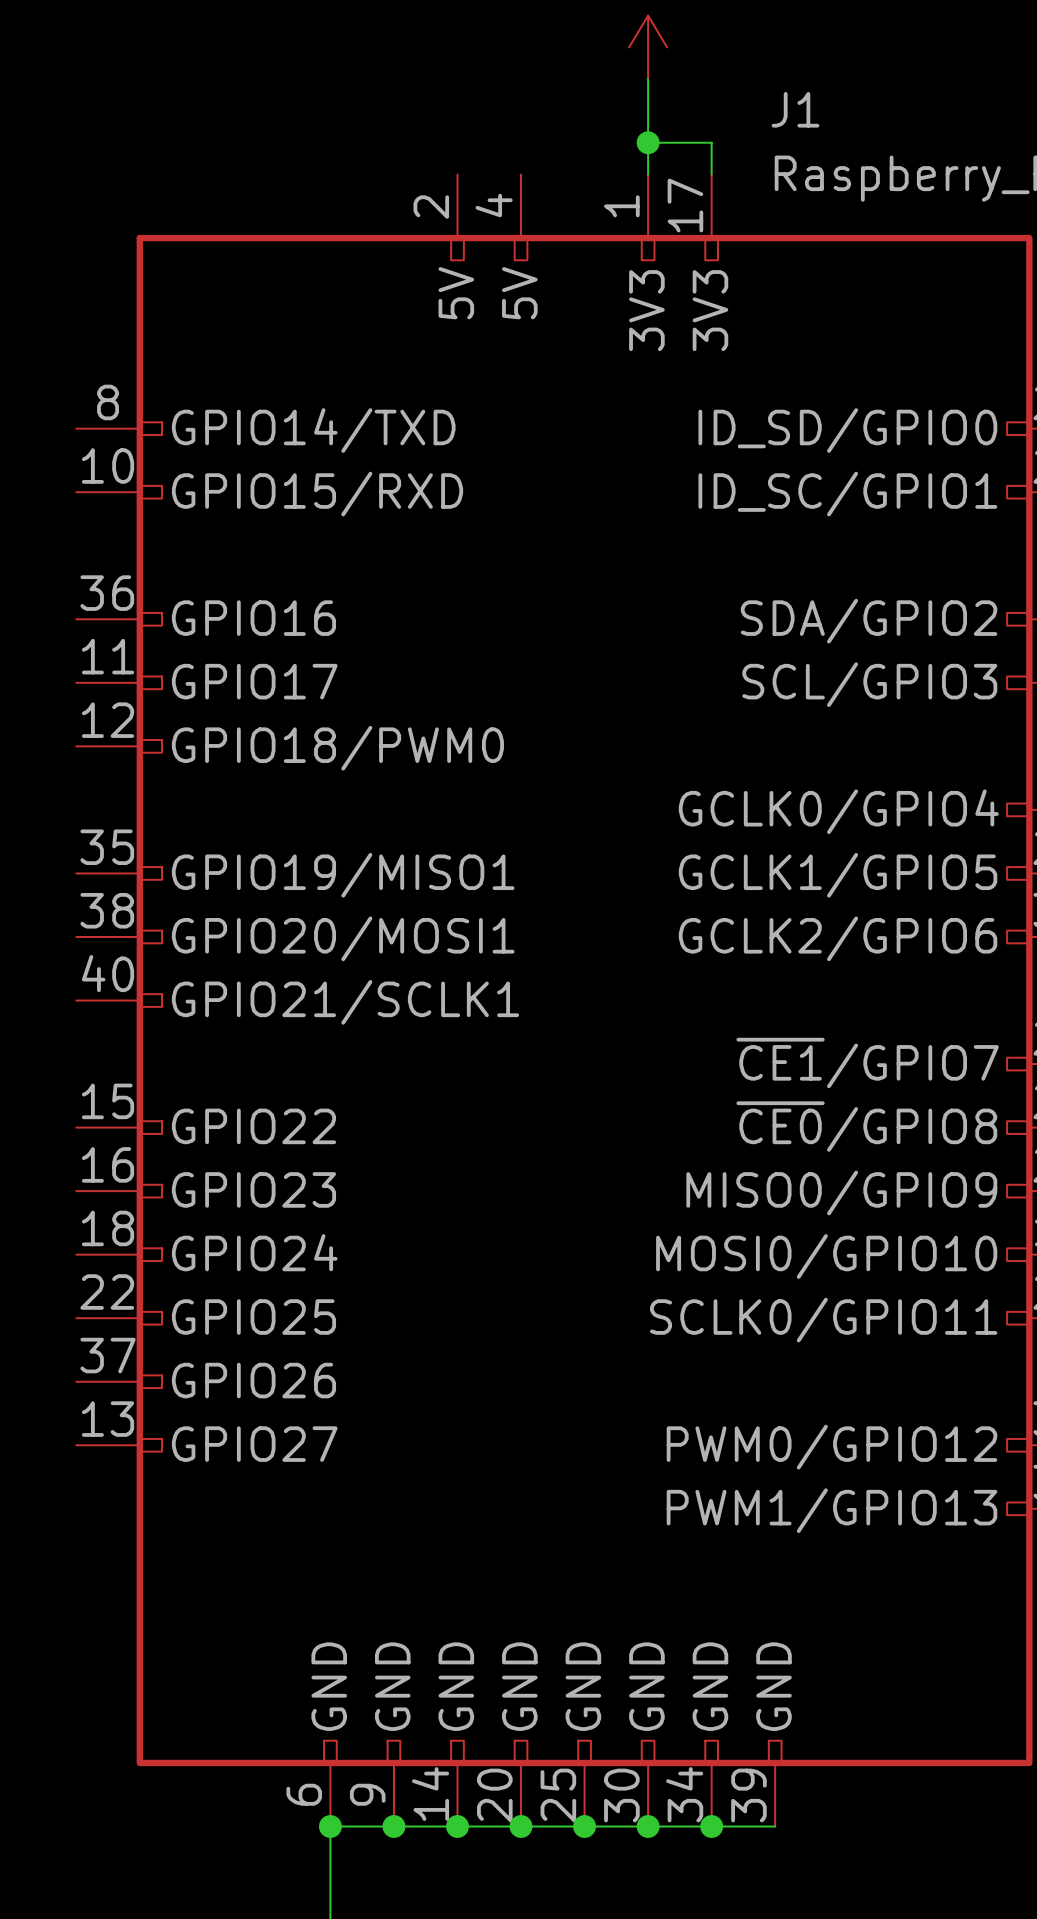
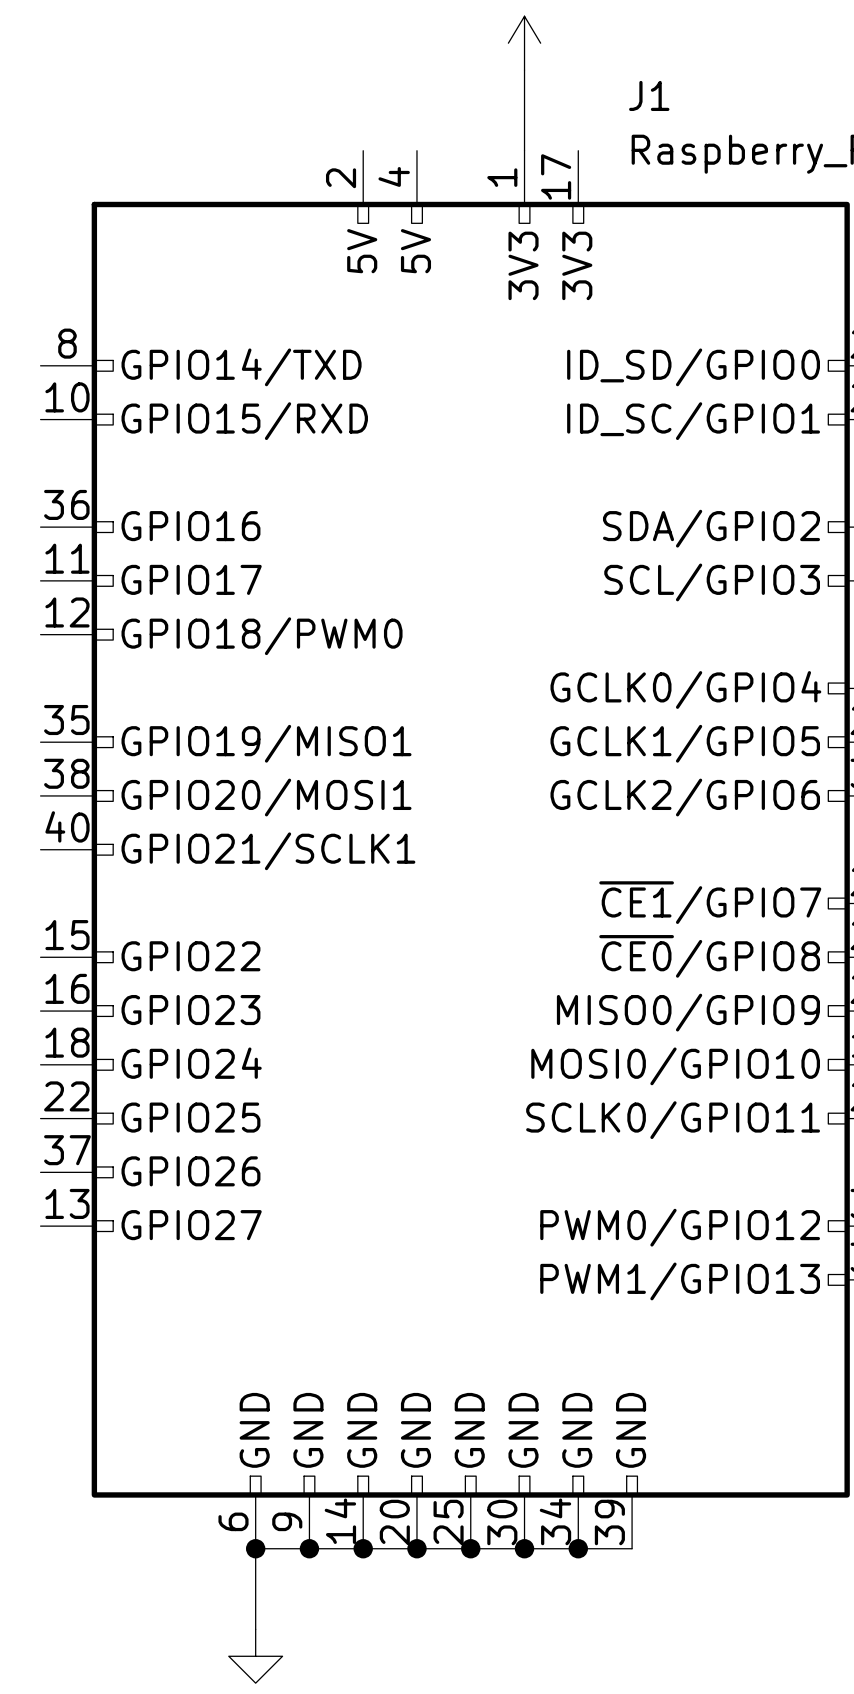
wire: (648, 142) (711, 142) (711, 174) -> none
junction: (648, 142) -> none

